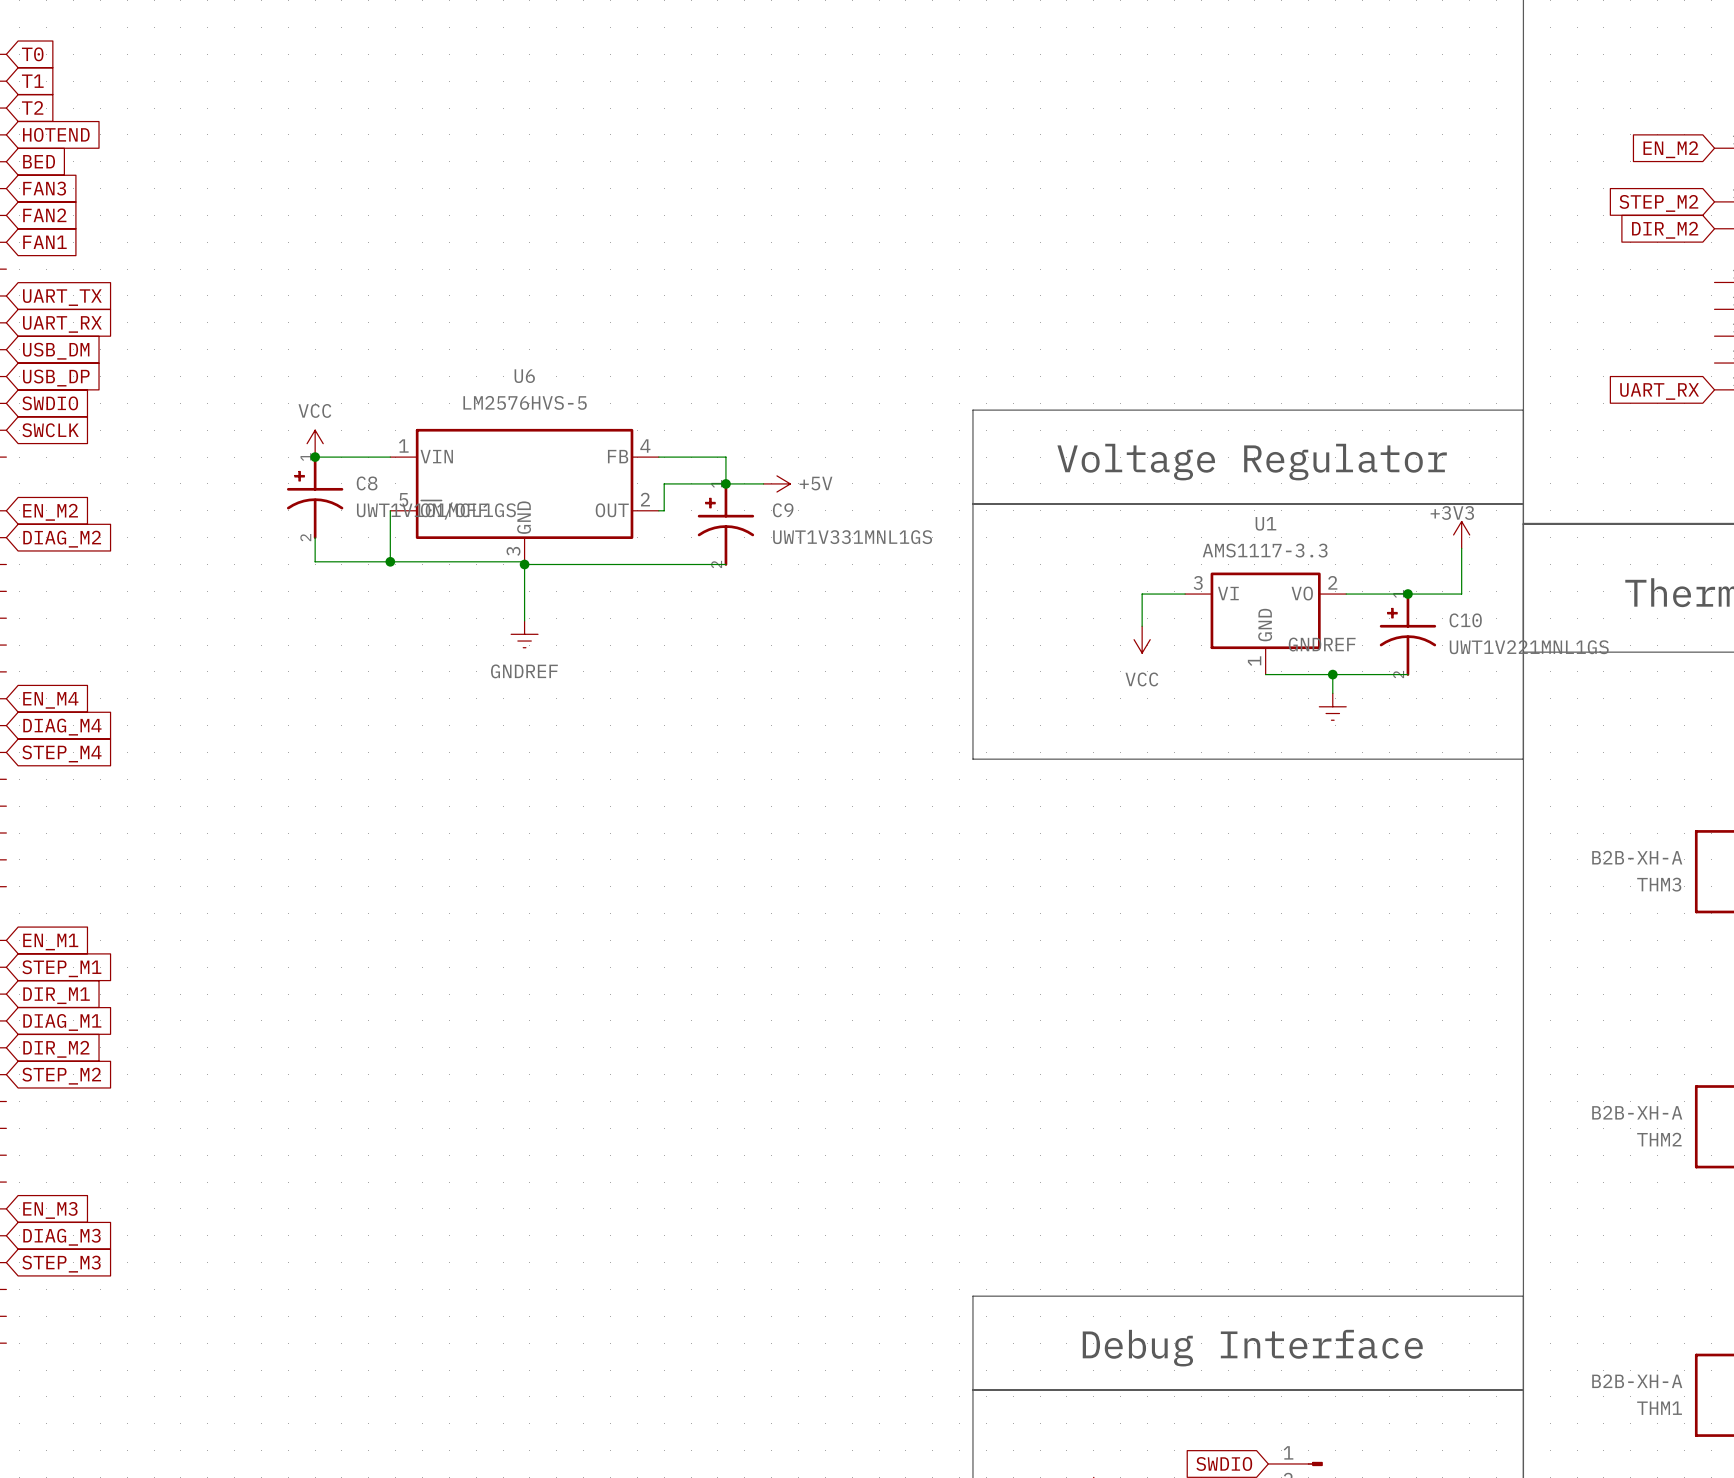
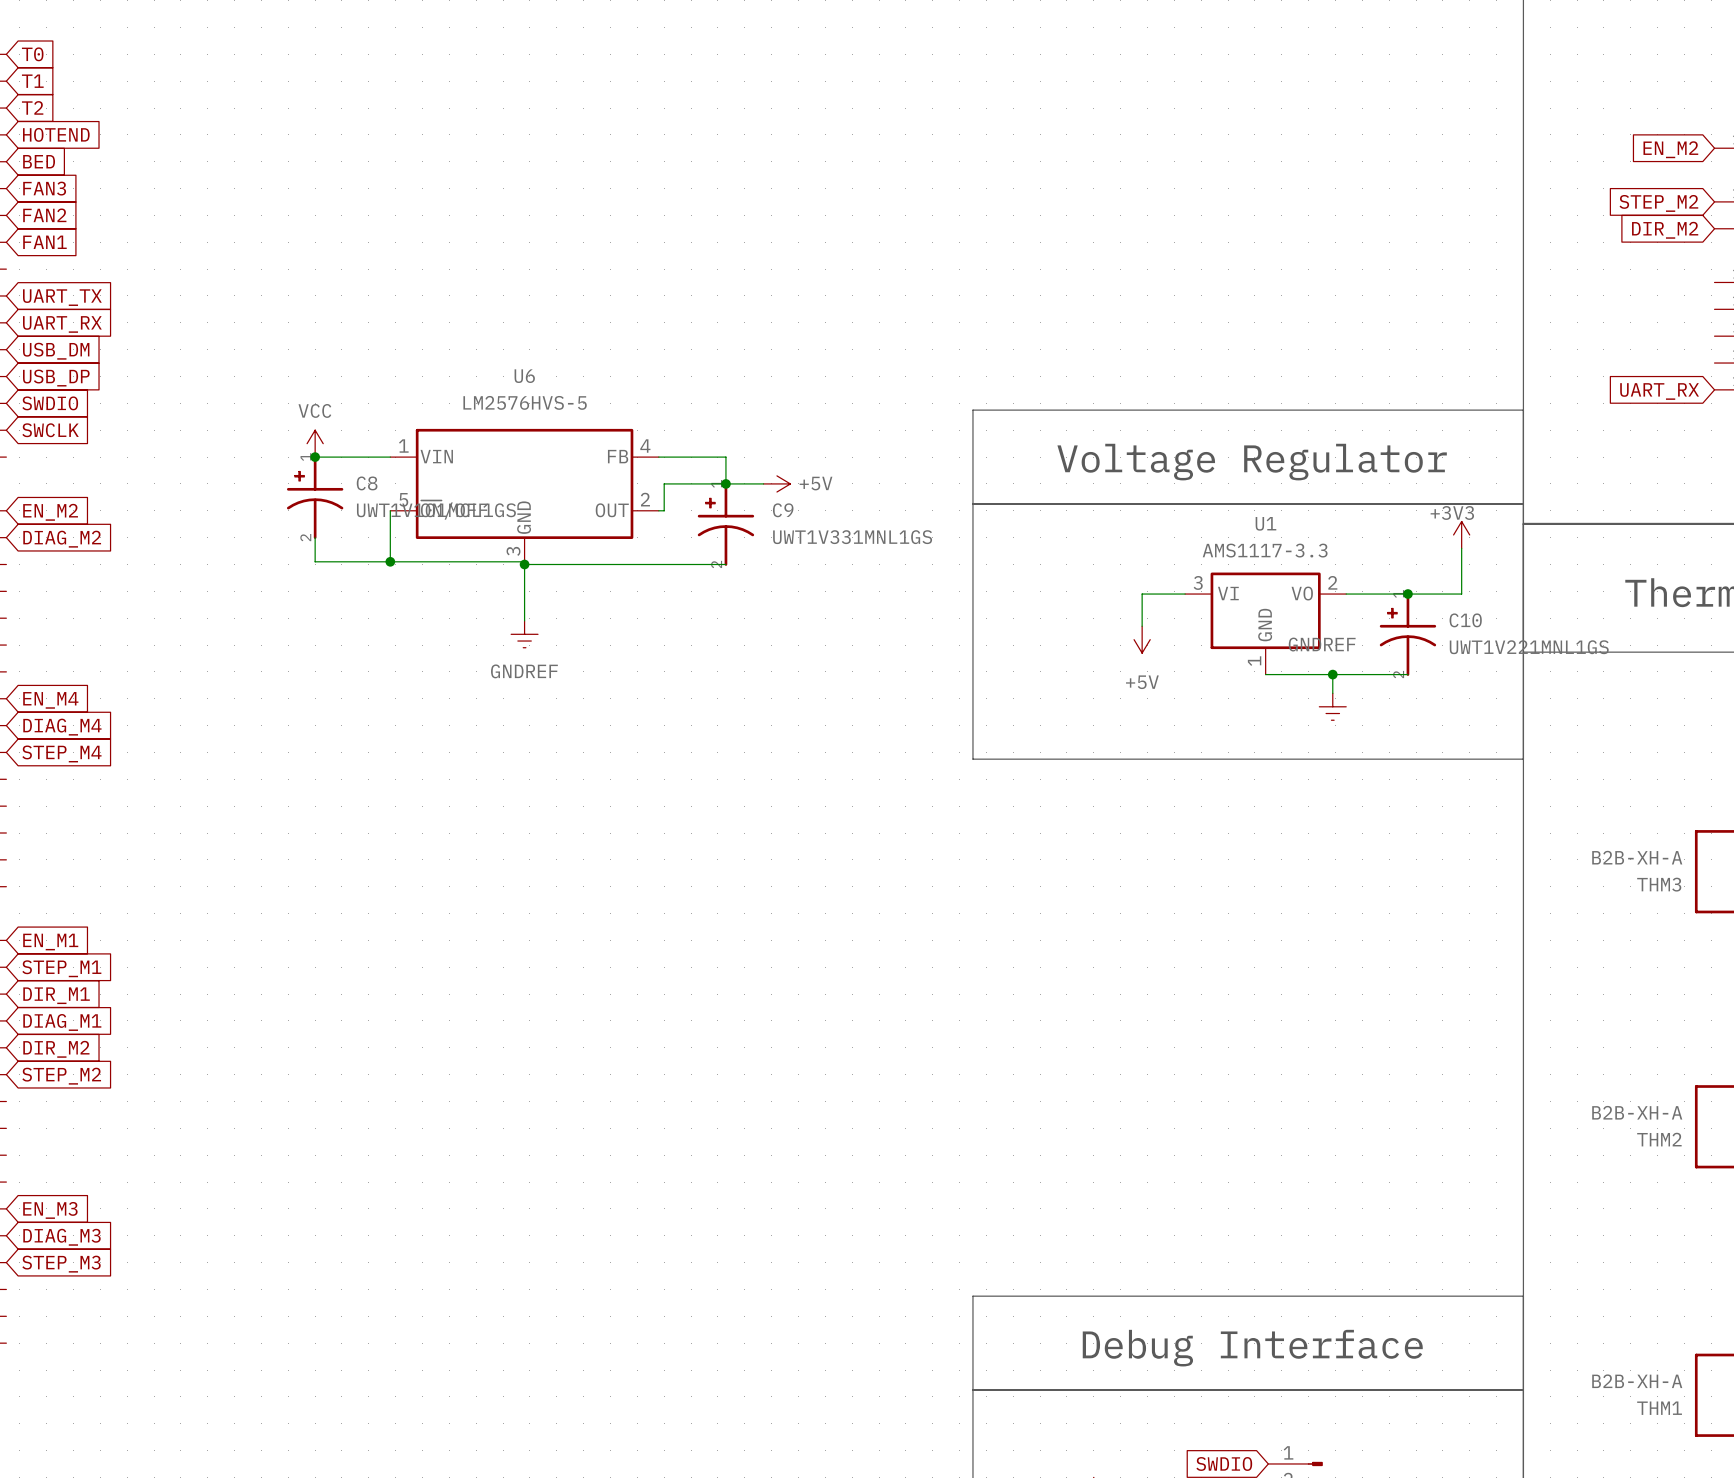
power symbol: VCC (1142, 639) -> +5V (1142, 639)

